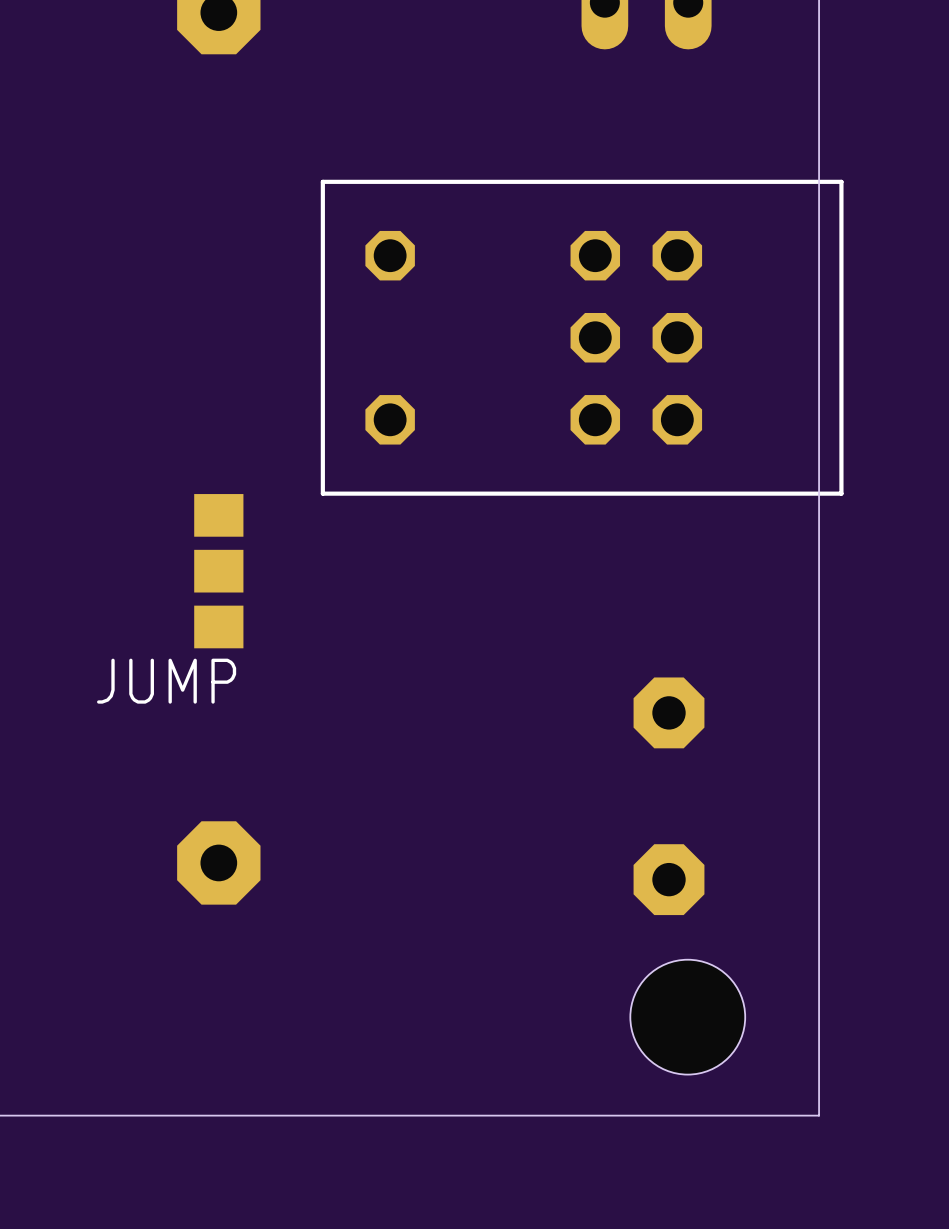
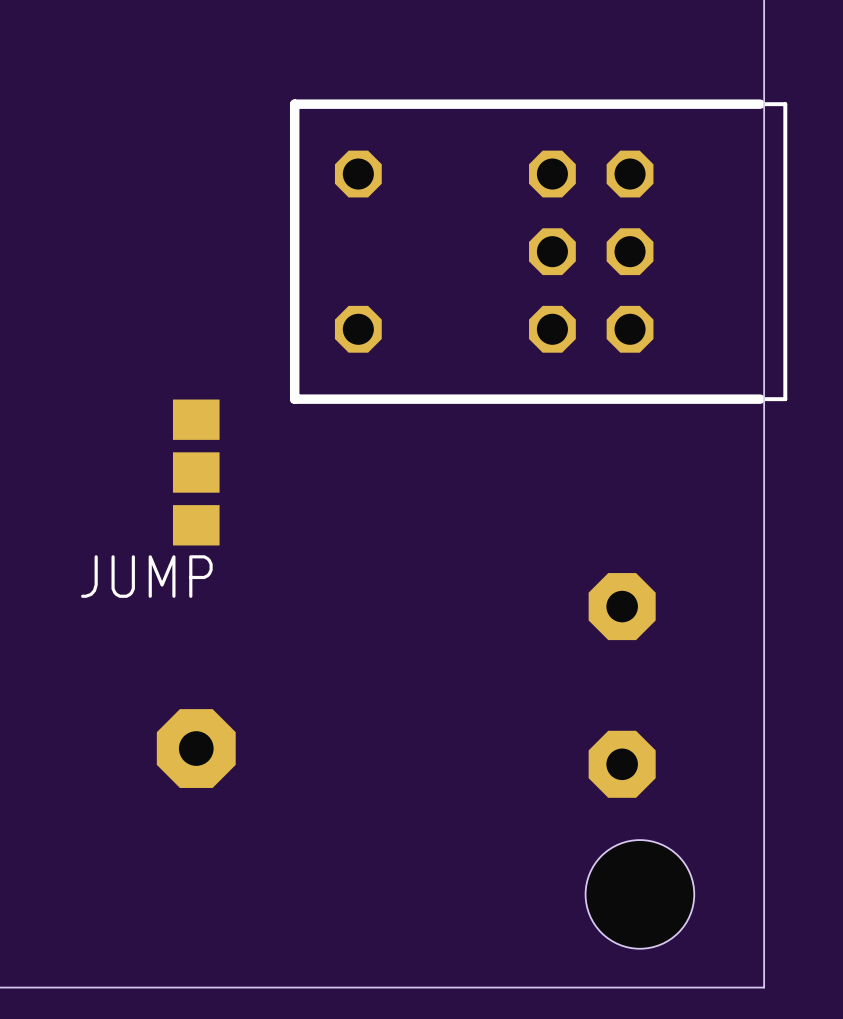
line: none -> (760, 104) (294, 104) (294, 399) (760, 399)

